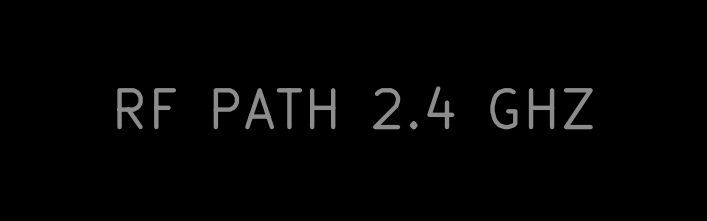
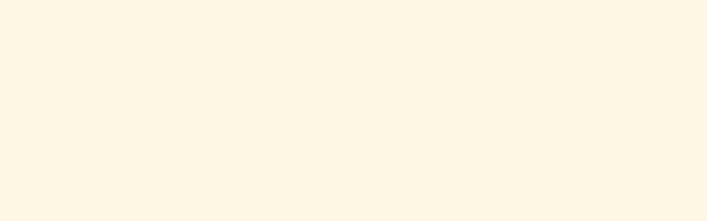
text: RF PATH 2.4 GHZ (355, 107) -> none

